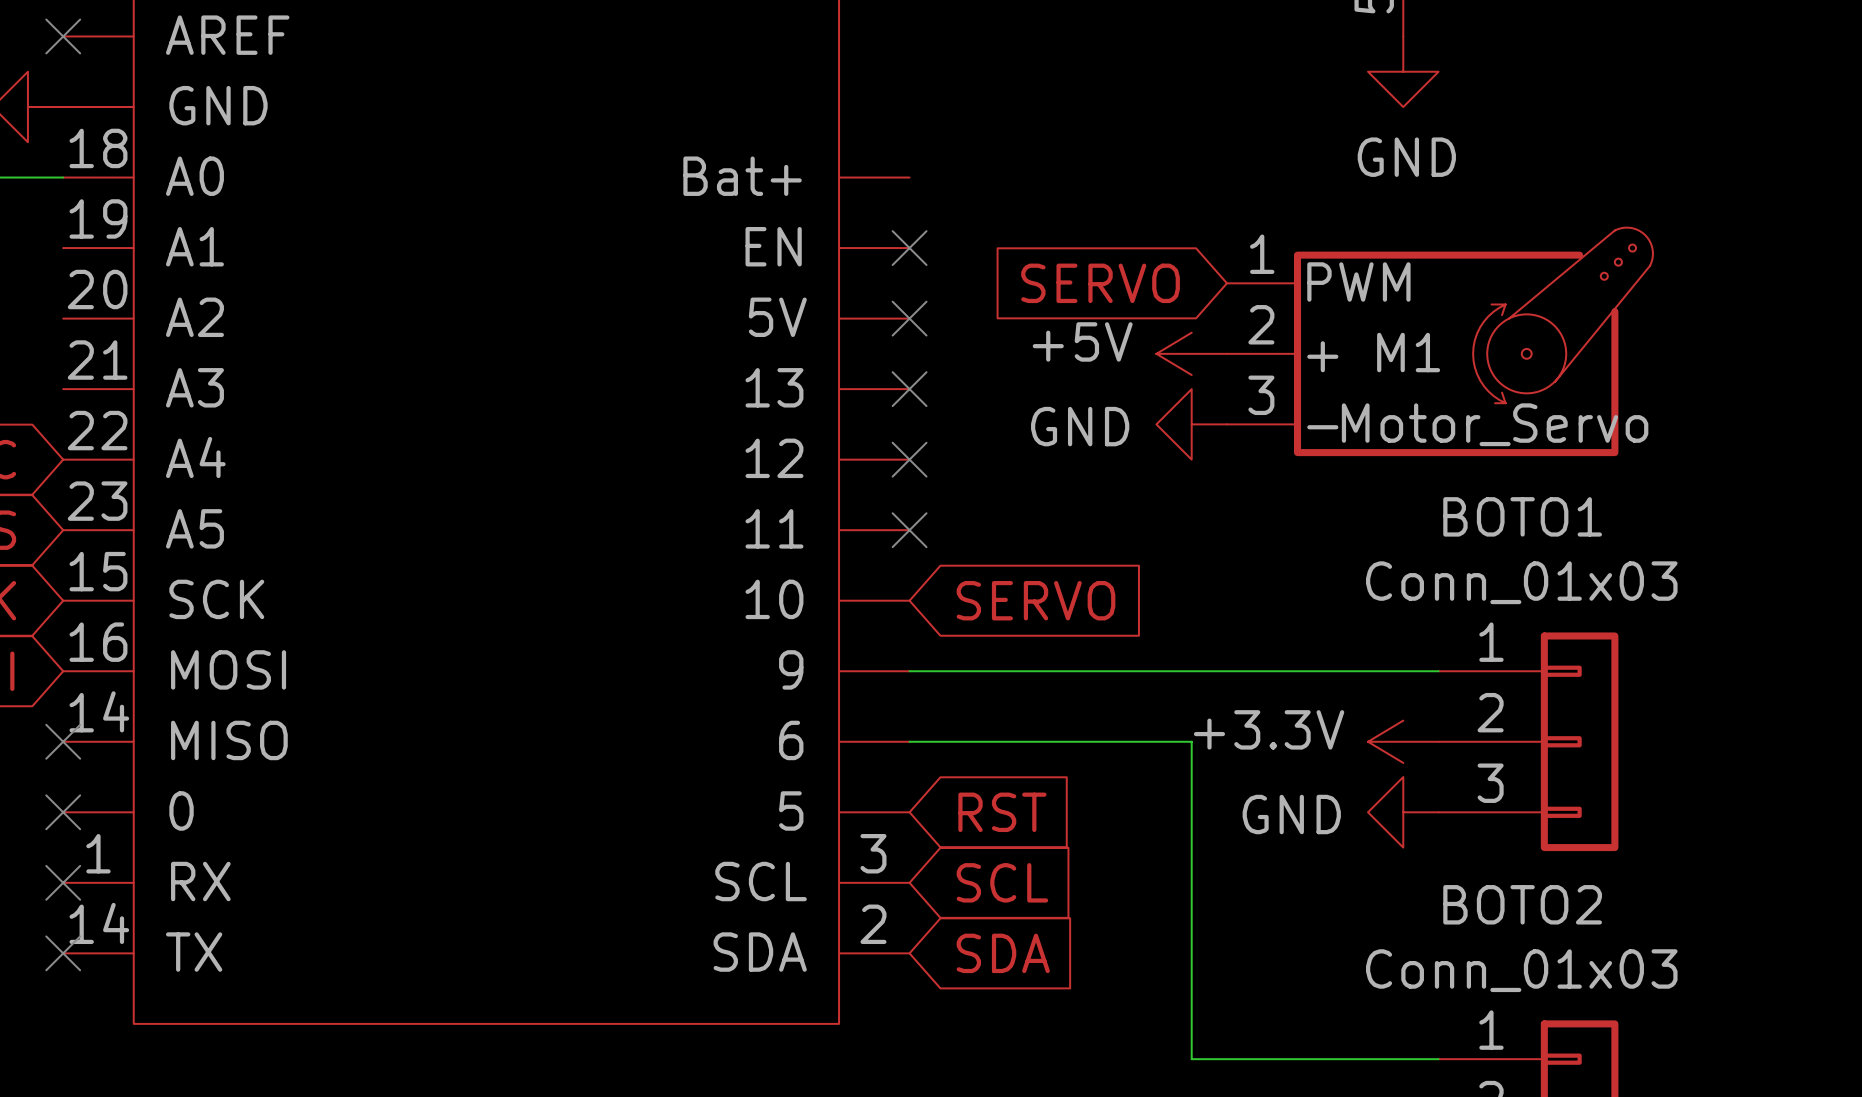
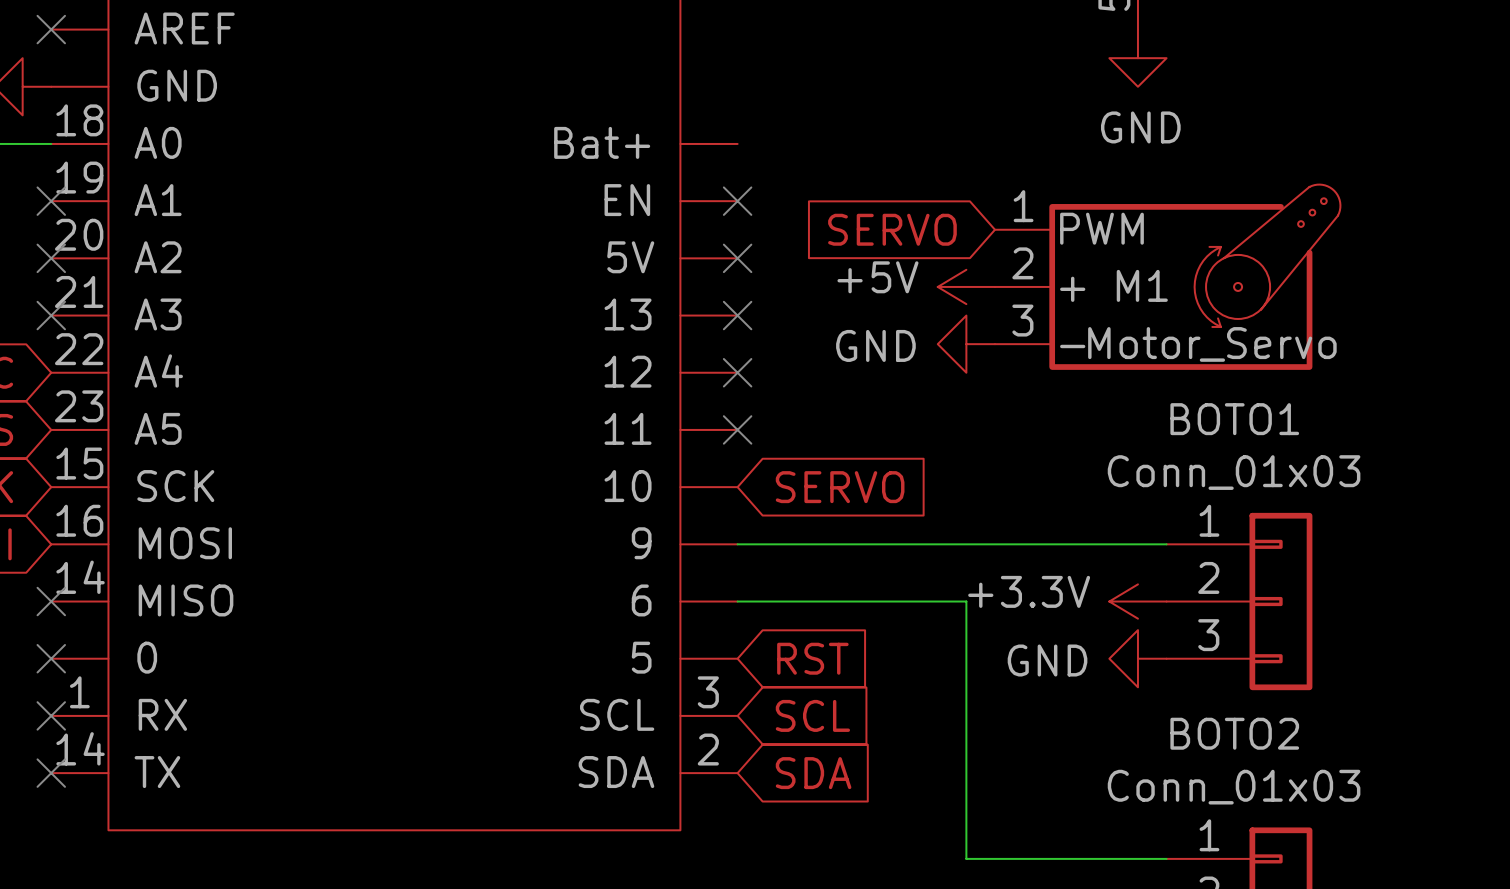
no-connect mark: none -> (51, 201)
no-connect mark: none -> (51, 258)
no-connect mark: none -> (51, 315)

